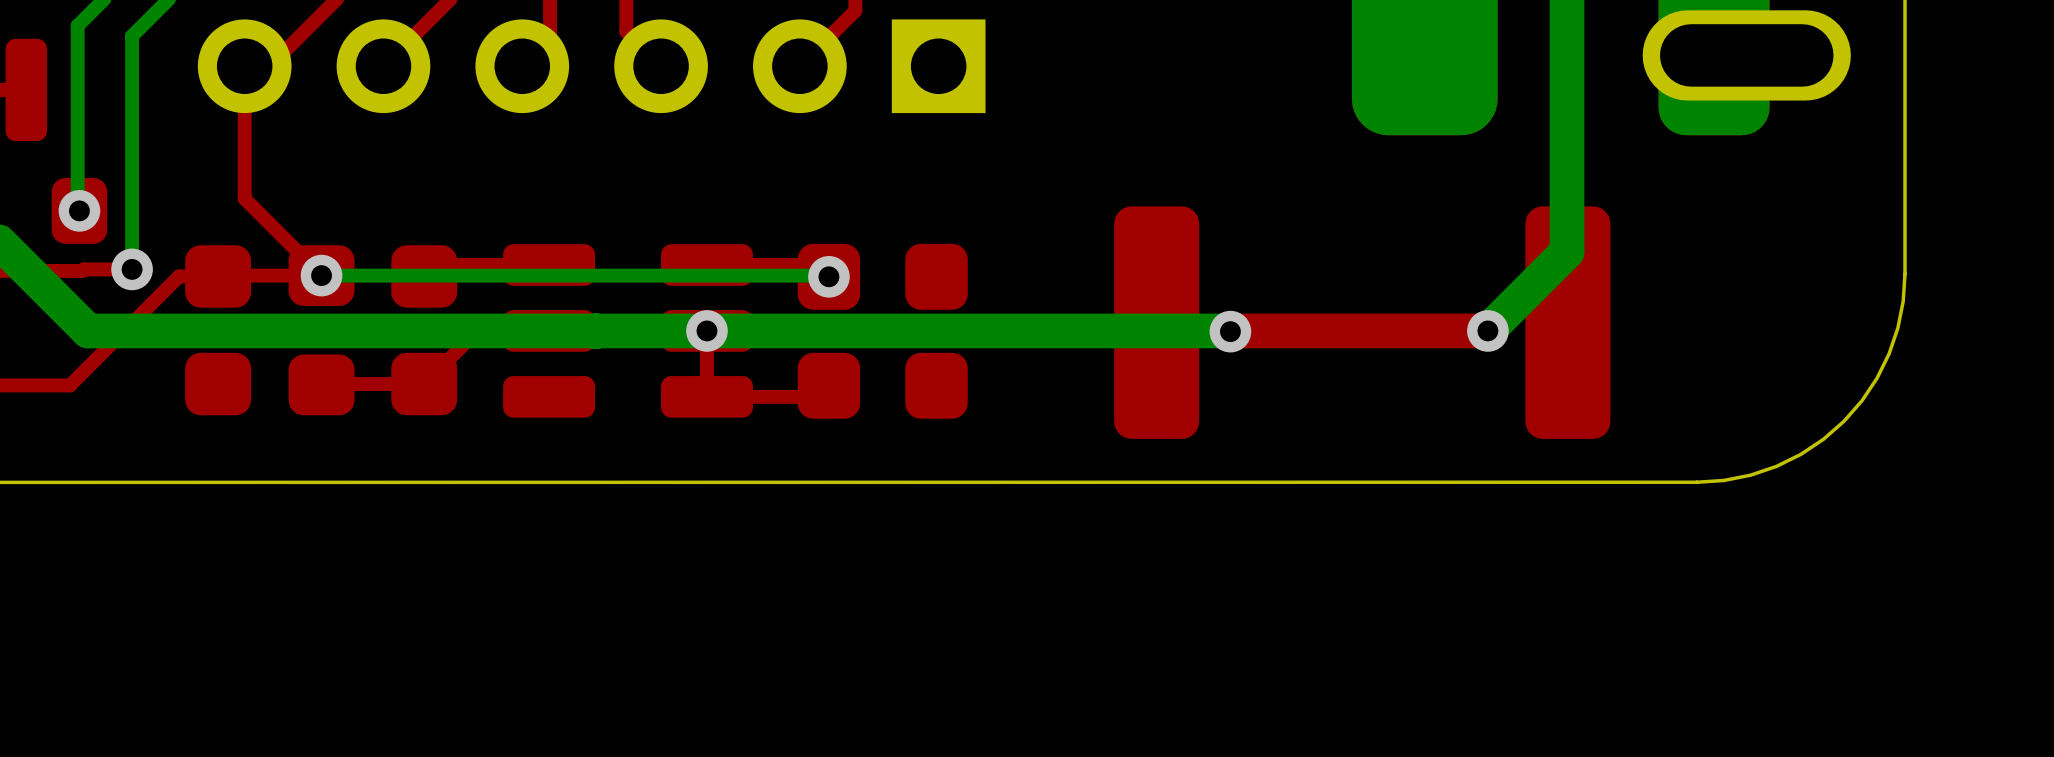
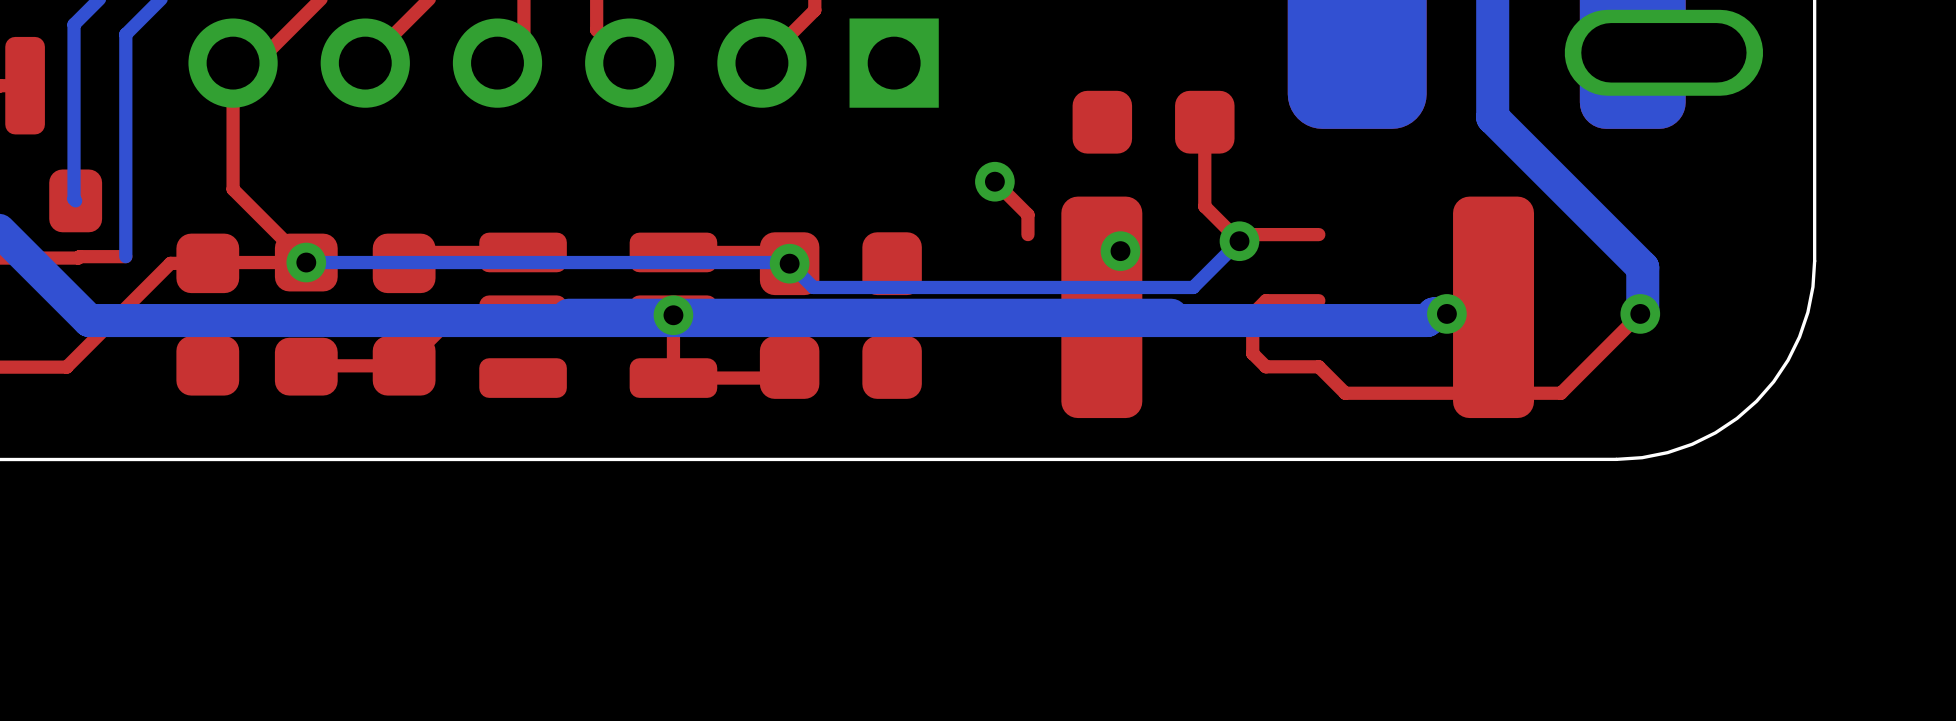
bottom track: (1567, 123) (1567, 251) (1487, 330) -> (1492, 117) (1642, 267) (1642, 311) (1640, 313)
part: none -> (1153, 122)
top track: none -> (1204, 122) (1204, 206) (1239, 241) (1246, 234) (1318, 234)
top track: none -> (994, 181) (1027, 214) (1027, 234)
via: none -> (994, 181)
via: (79, 210) -> none
bottom track: none -> (1239, 241) (1193, 287) (813, 287) (789, 263)
via: none -> (1239, 241)
via: none -> (1120, 251)
via: (132, 269) -> none
top track: none -> (1318, 300) (1265, 300) (1252, 313) (1252, 353) (1265, 366) (1318, 366) (1345, 393) (1560, 393) (1640, 313)
via: none -> (1640, 313)
bottom track: (595, 330) (88, 330) -> (1446, 313) (1433, 313) (1427, 320) (89, 320) (83, 315)
top track: (1487, 330) (1231, 330) -> none
via position: (1487, 330) -> (1446, 313)
via: (1230, 331) -> none

